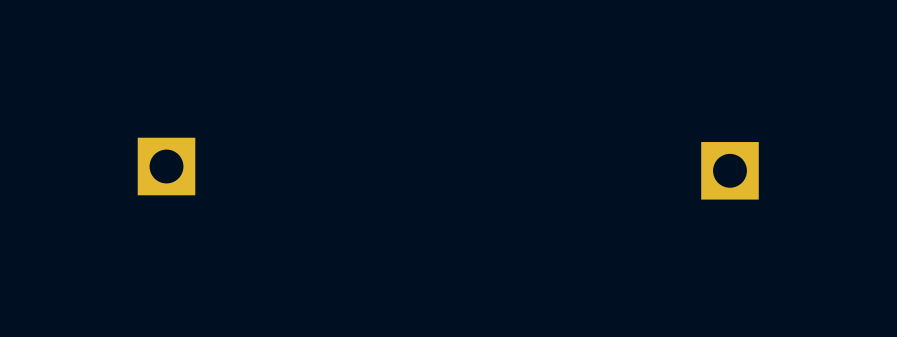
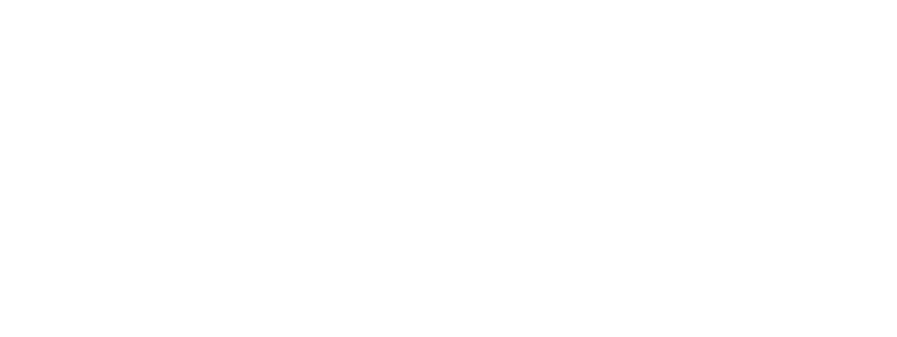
part: (166, 166) -> none
part: (729, 170) -> none

